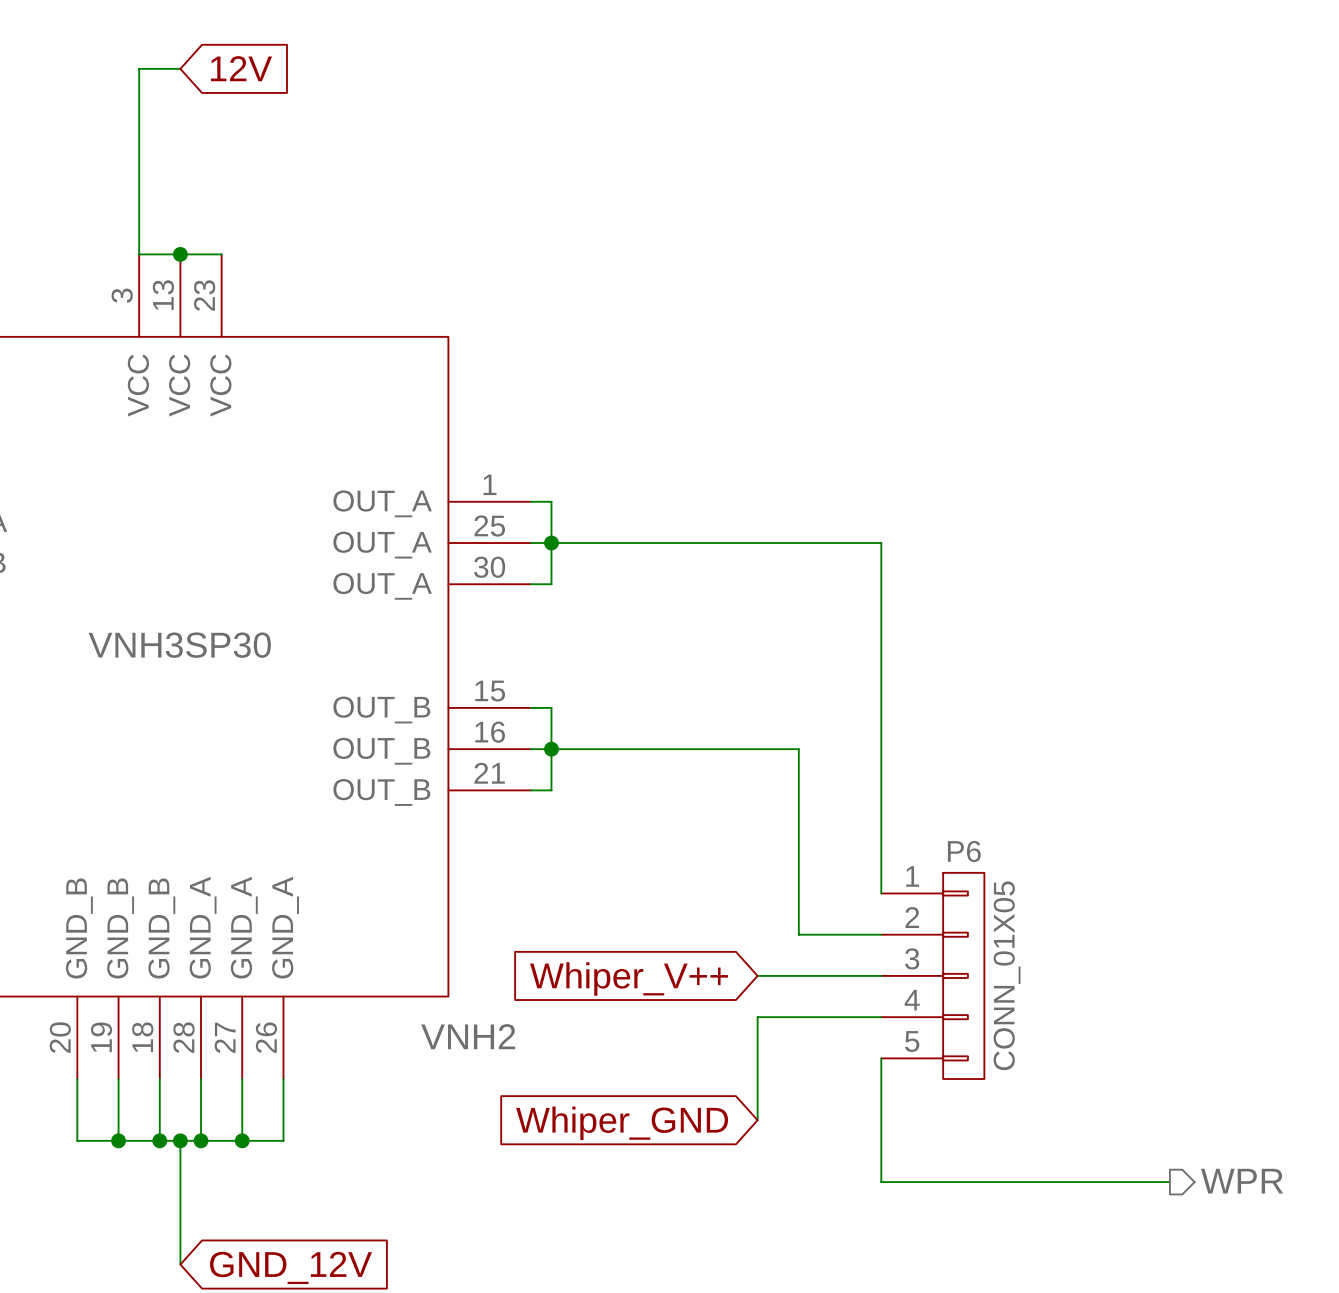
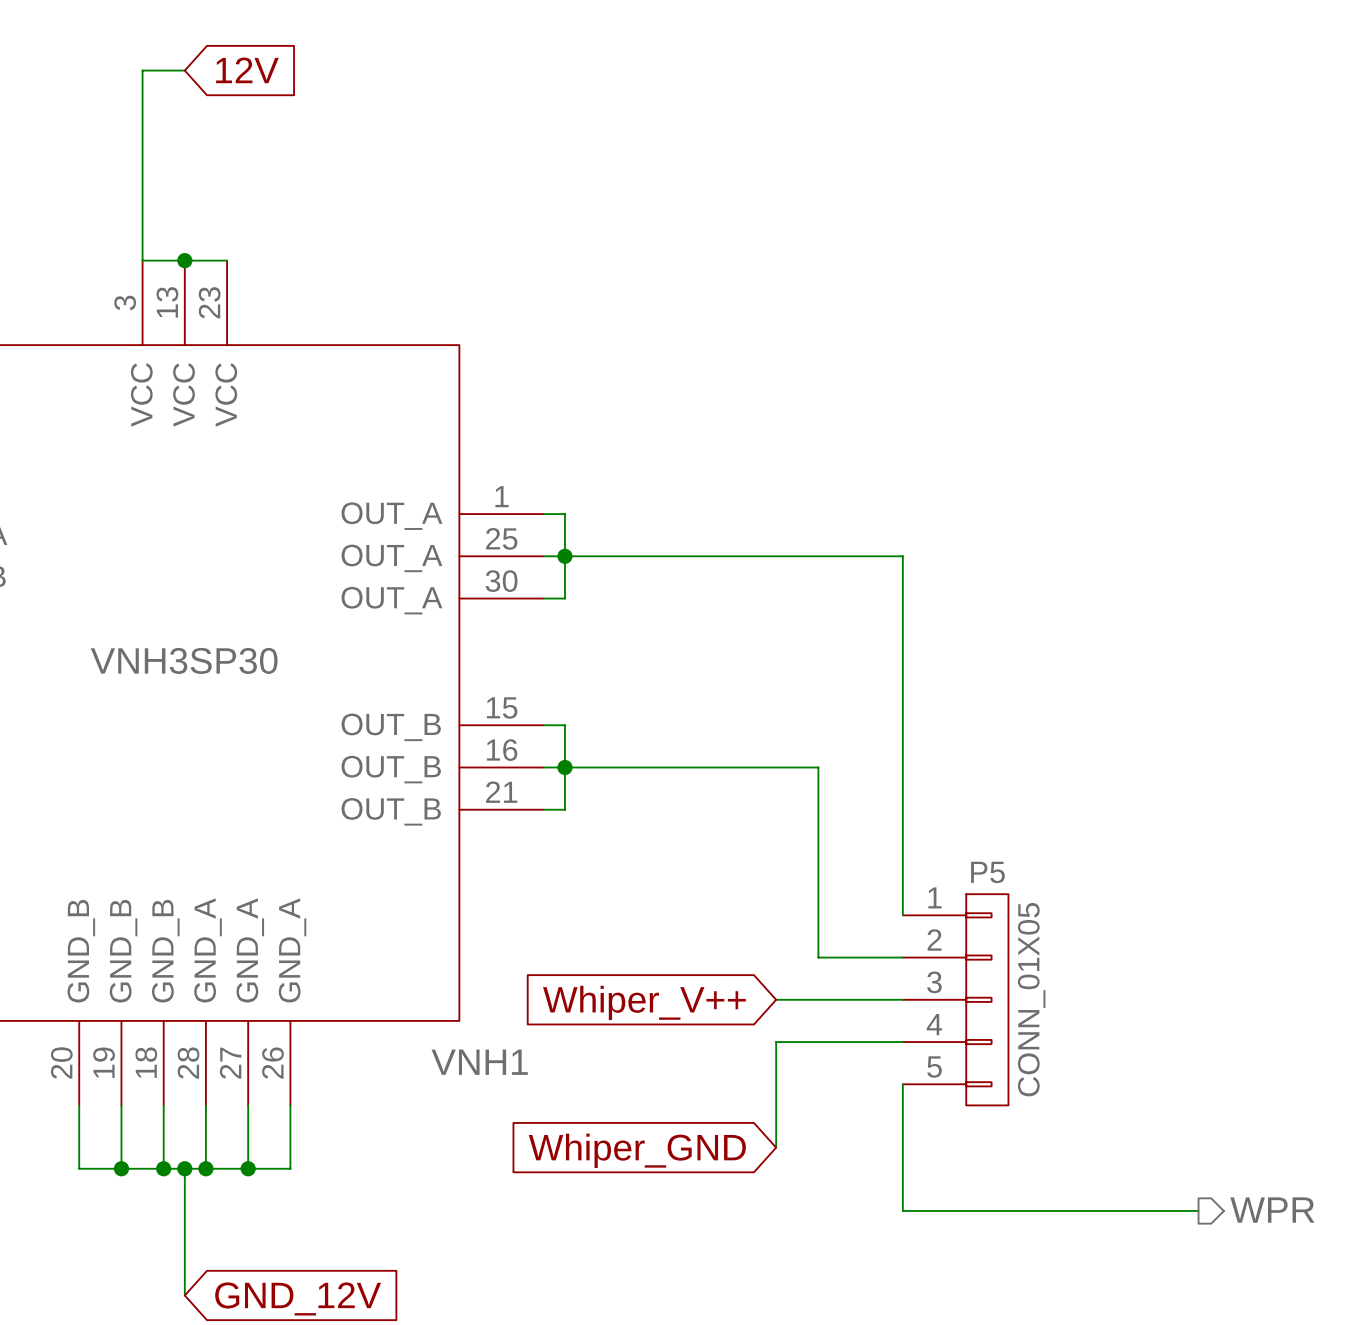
P6 name: P6 (964, 851) -> P5 (987, 872)
VNH2 name: VNH2 (468, 1036) -> VNH1 (479, 1062)

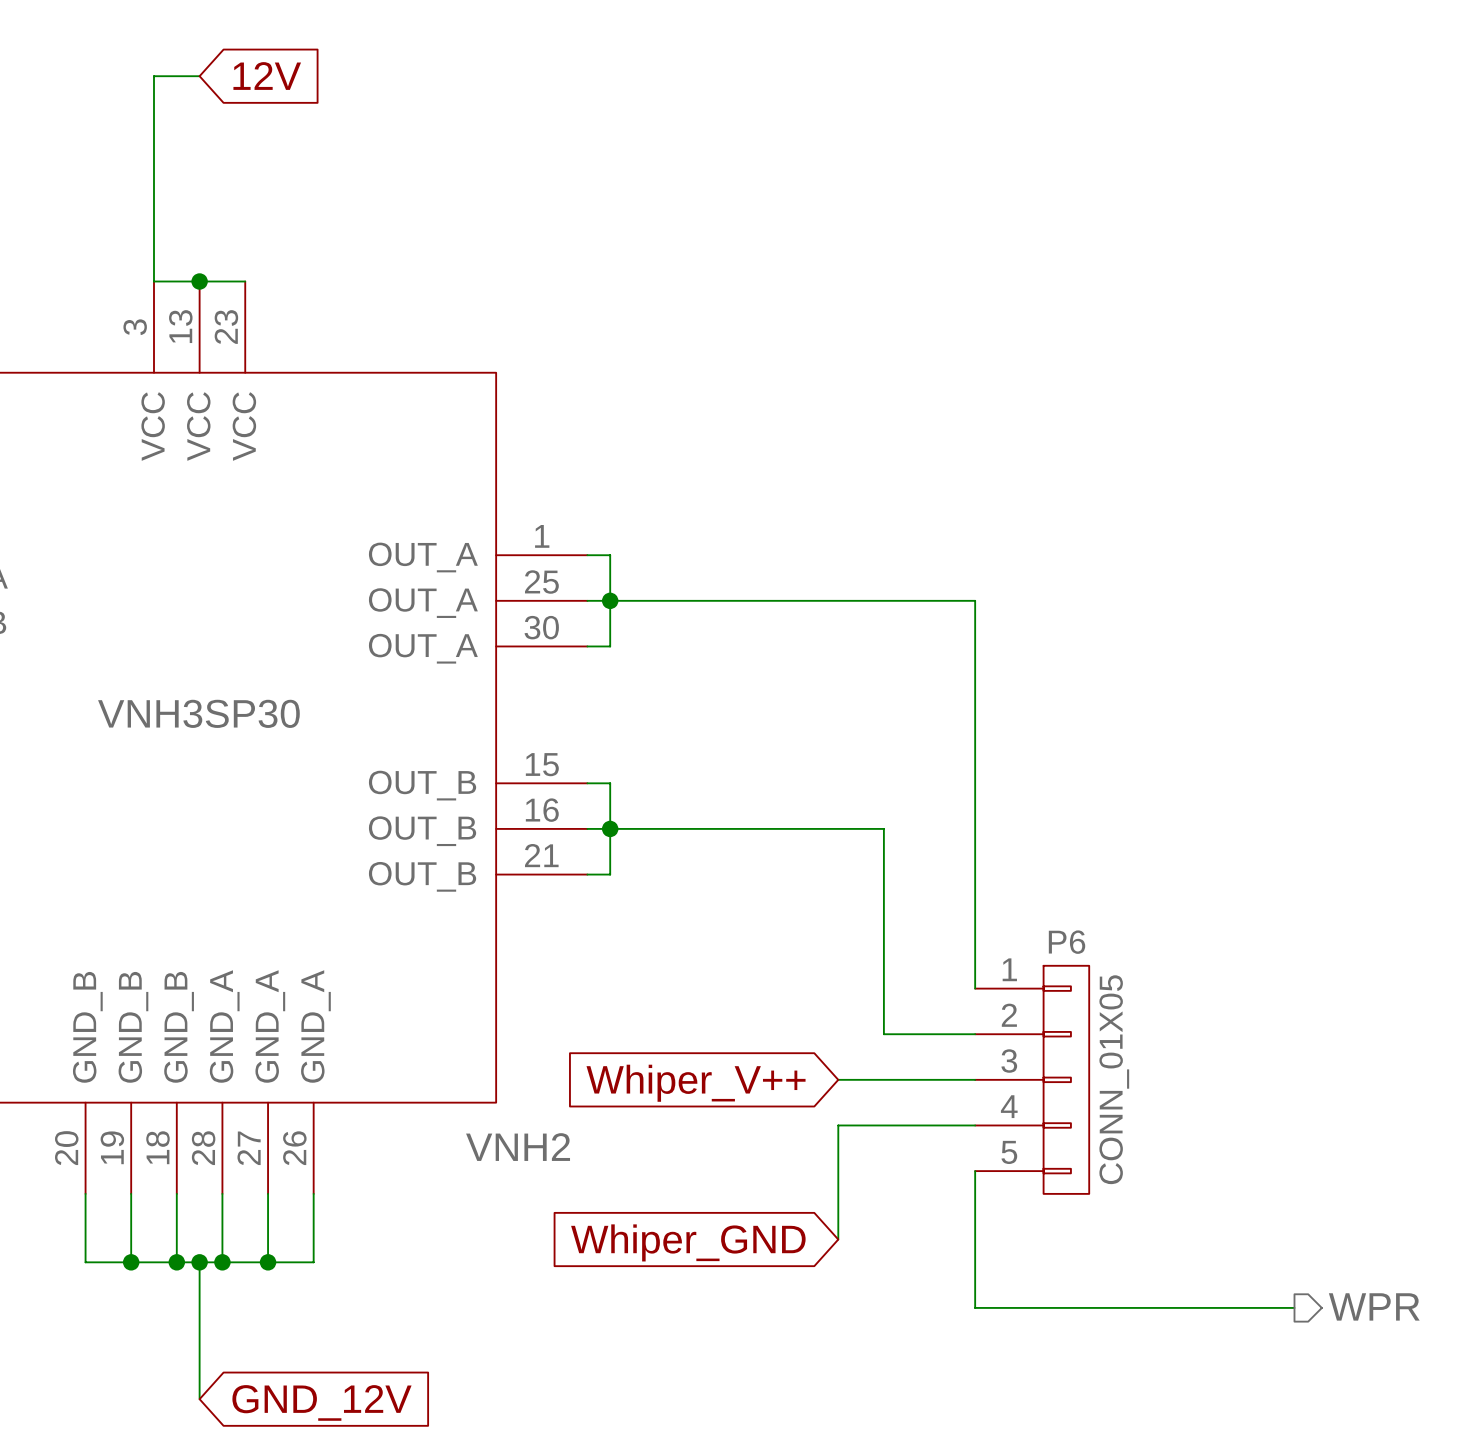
P5 name: P5 (987, 872) -> P6 (1067, 942)
VNH1 name: VNH1 (479, 1062) -> VNH2 (518, 1147)

